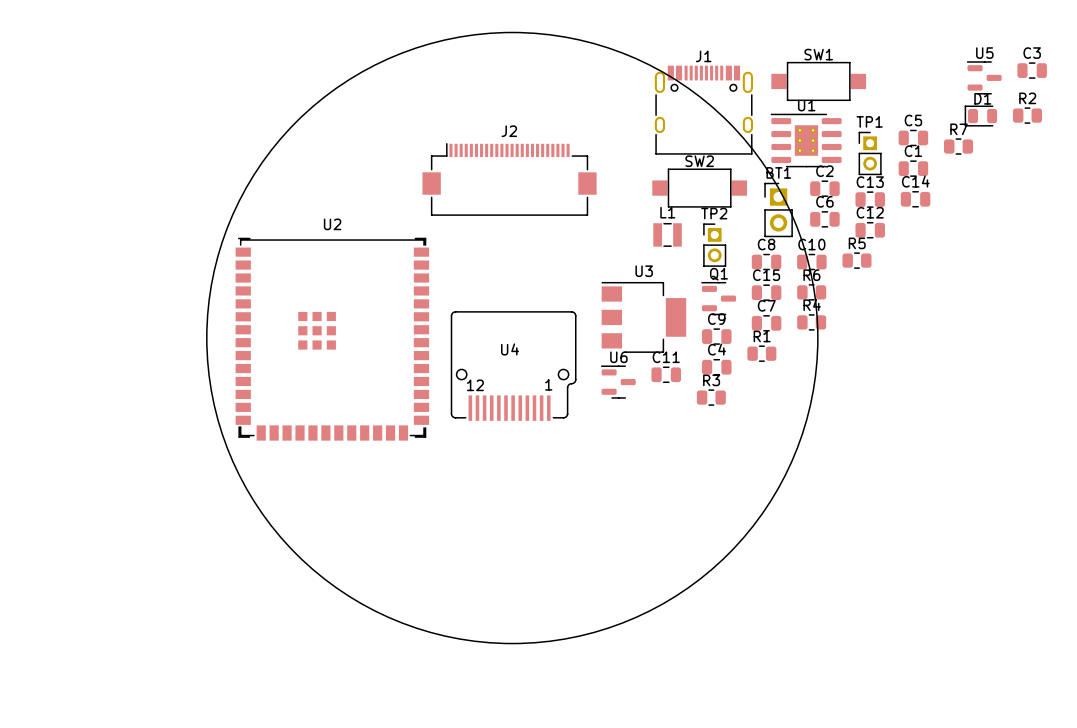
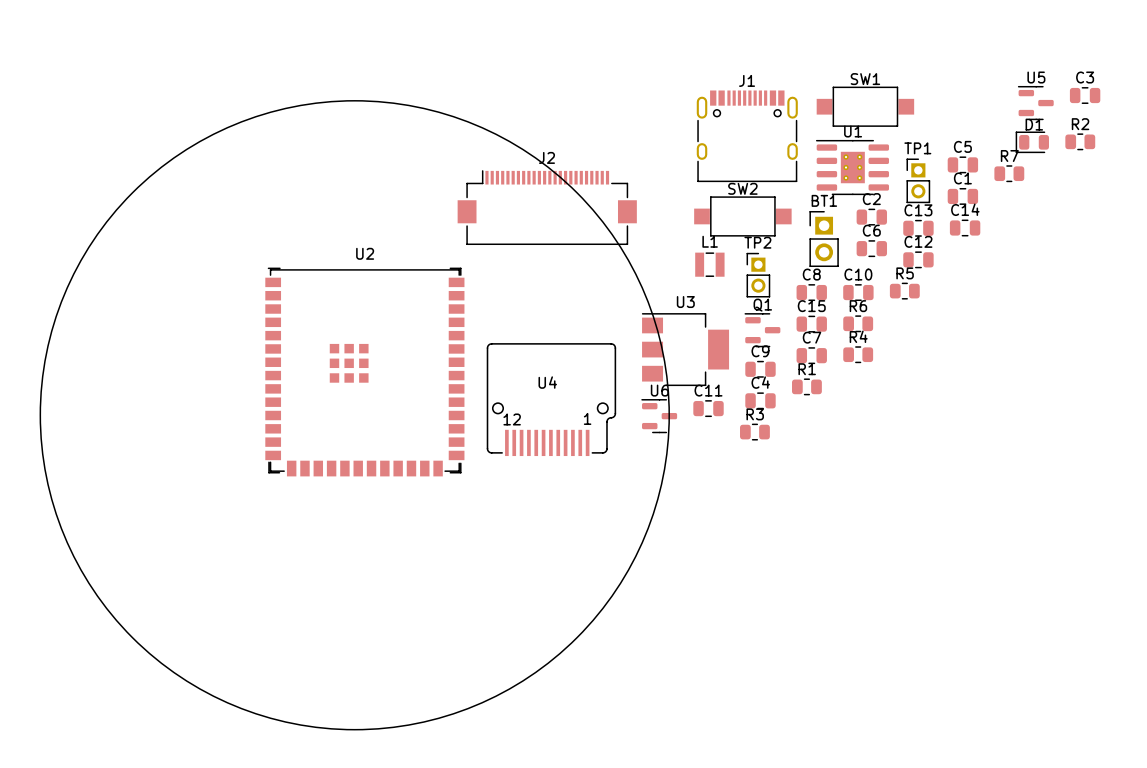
round board edge position: (512, 338) -> (354, 415)

